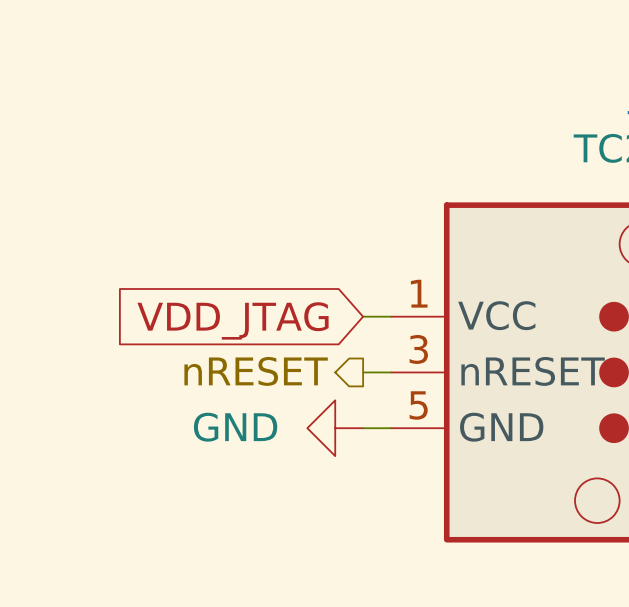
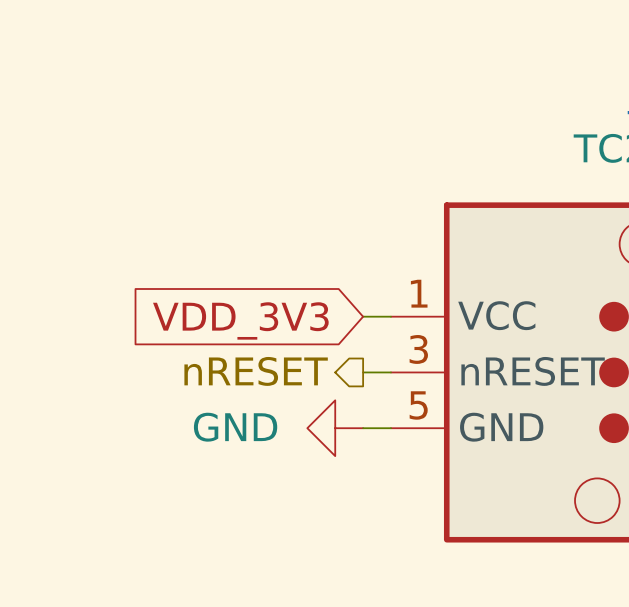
global label: VDD_JTAG (233, 320) -> VDD_3V3 (240, 320)

